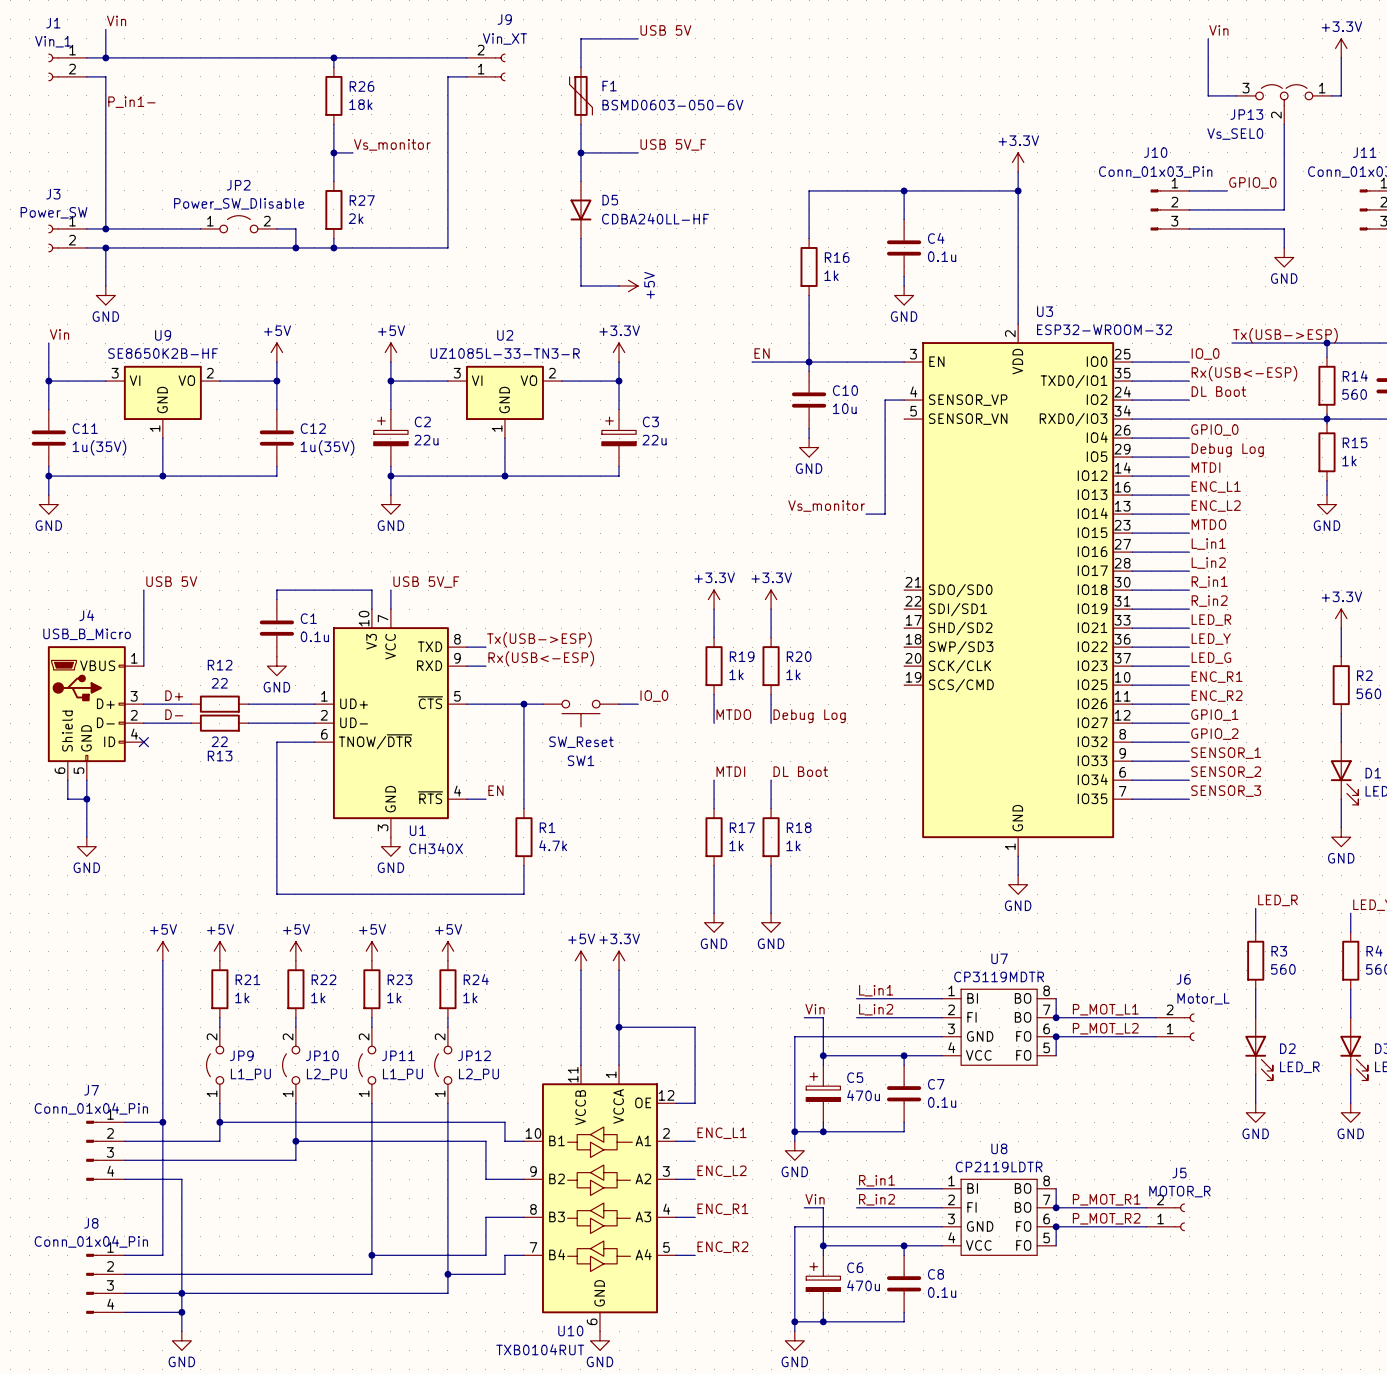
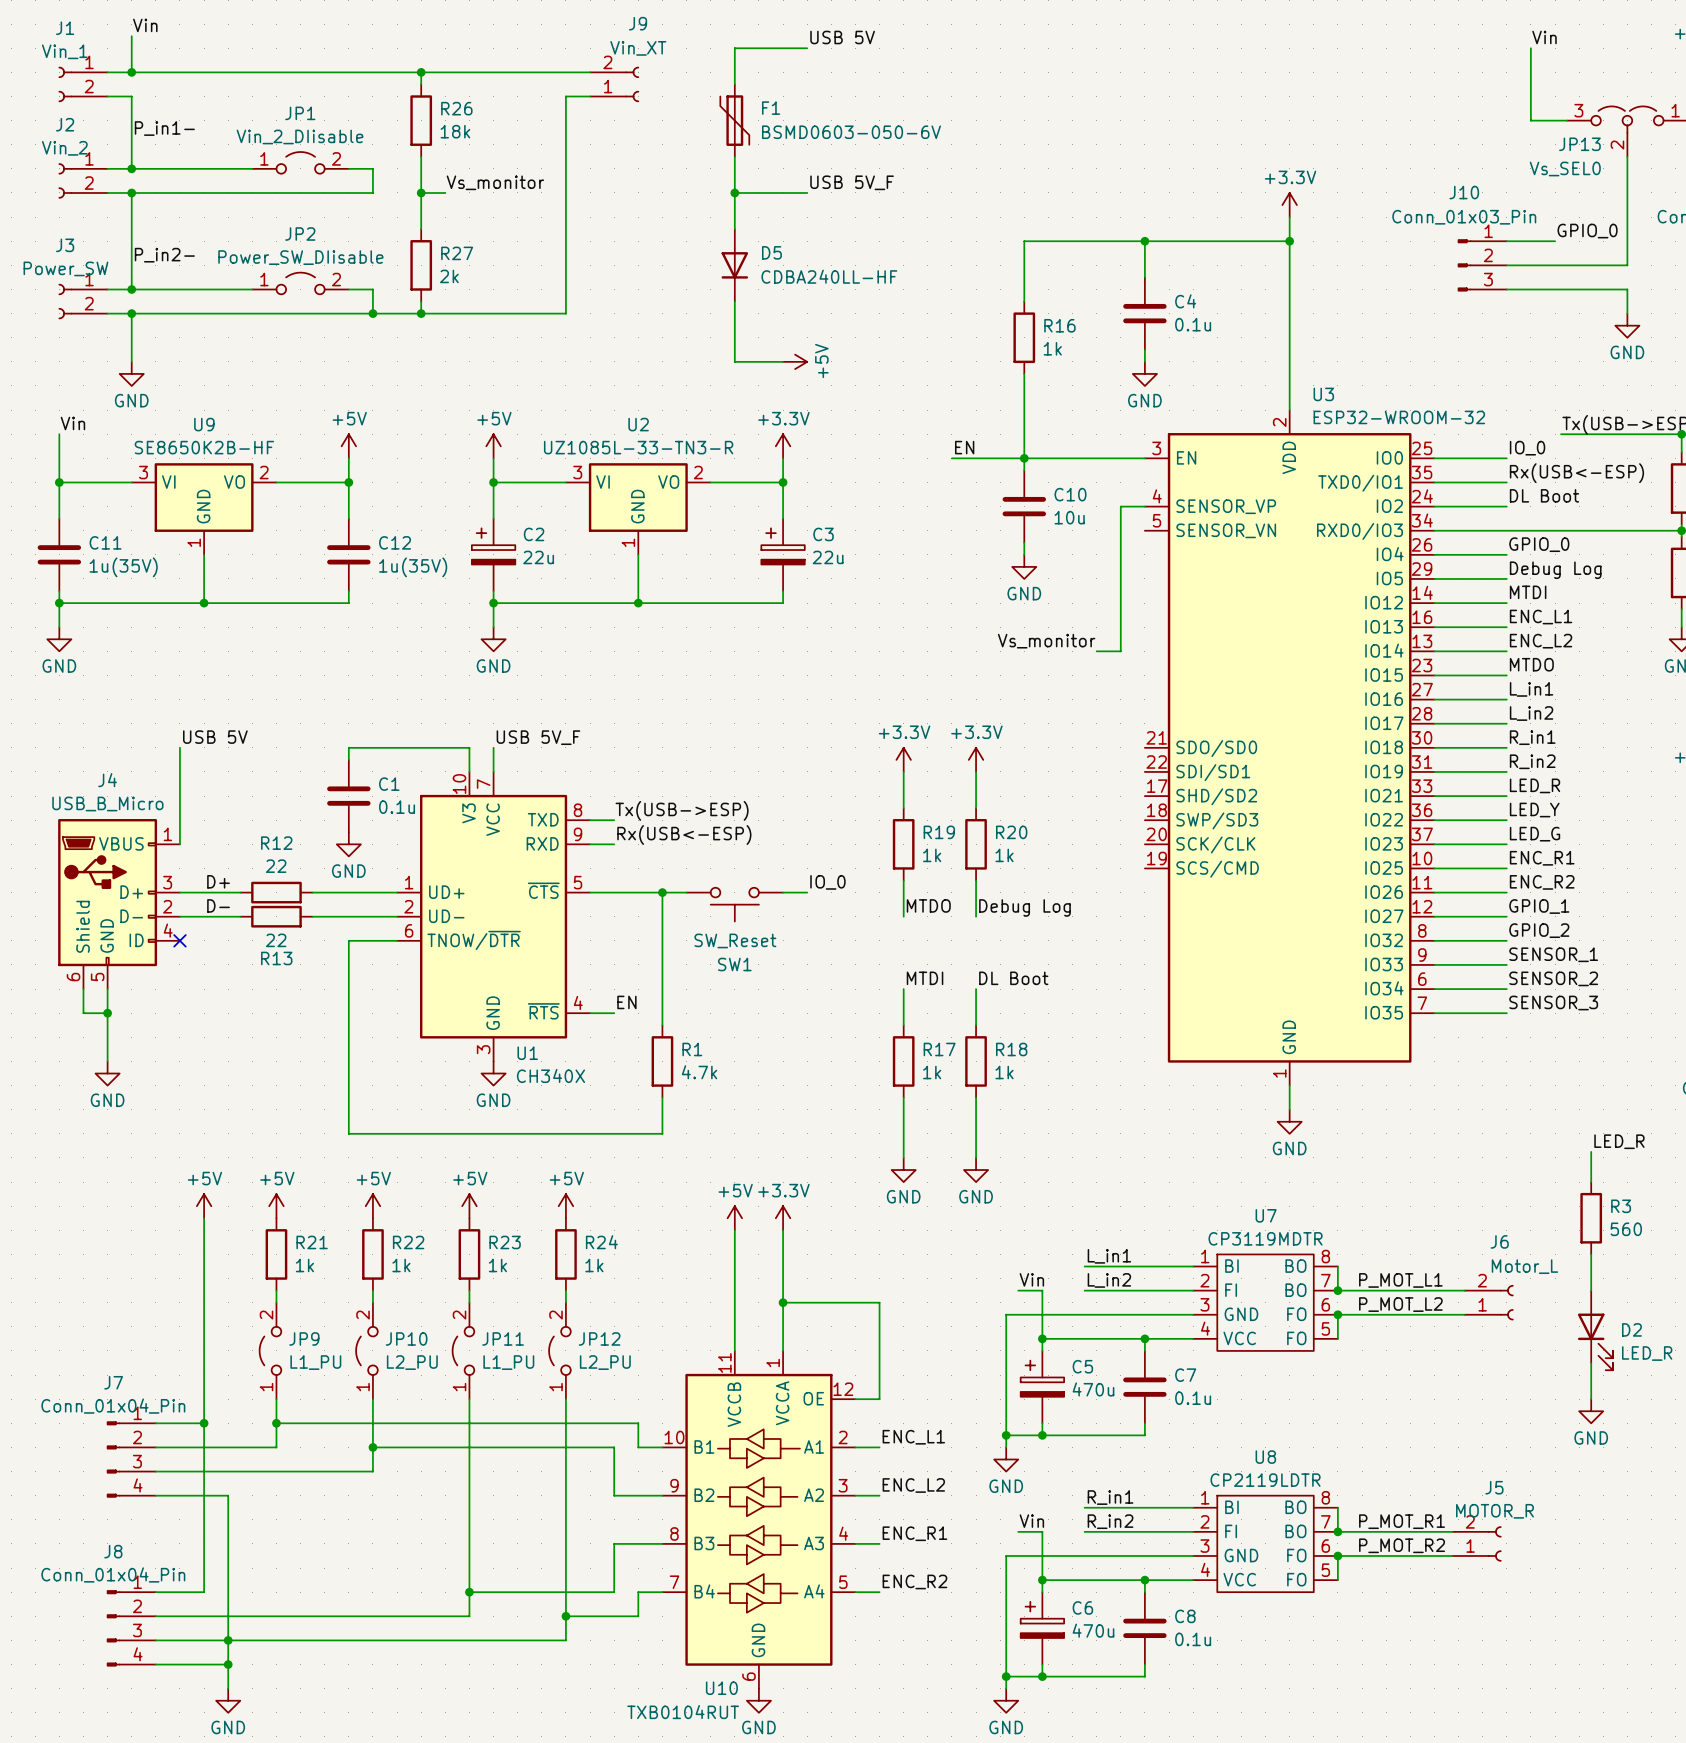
JP1: none -> Vin_2_DIisable (300, 162)
wire: none -> (107, 168) (252, 168)
wire: (105, 133) (105, 152) -> none
junction: none -> (131, 168)
wire: none -> (348, 168) (372, 168) (372, 192) (107, 192)
J2: none -> Vin_2 (83, 180)
junction: none -> (131, 192)
label: none -> P_in2- (164, 255)

